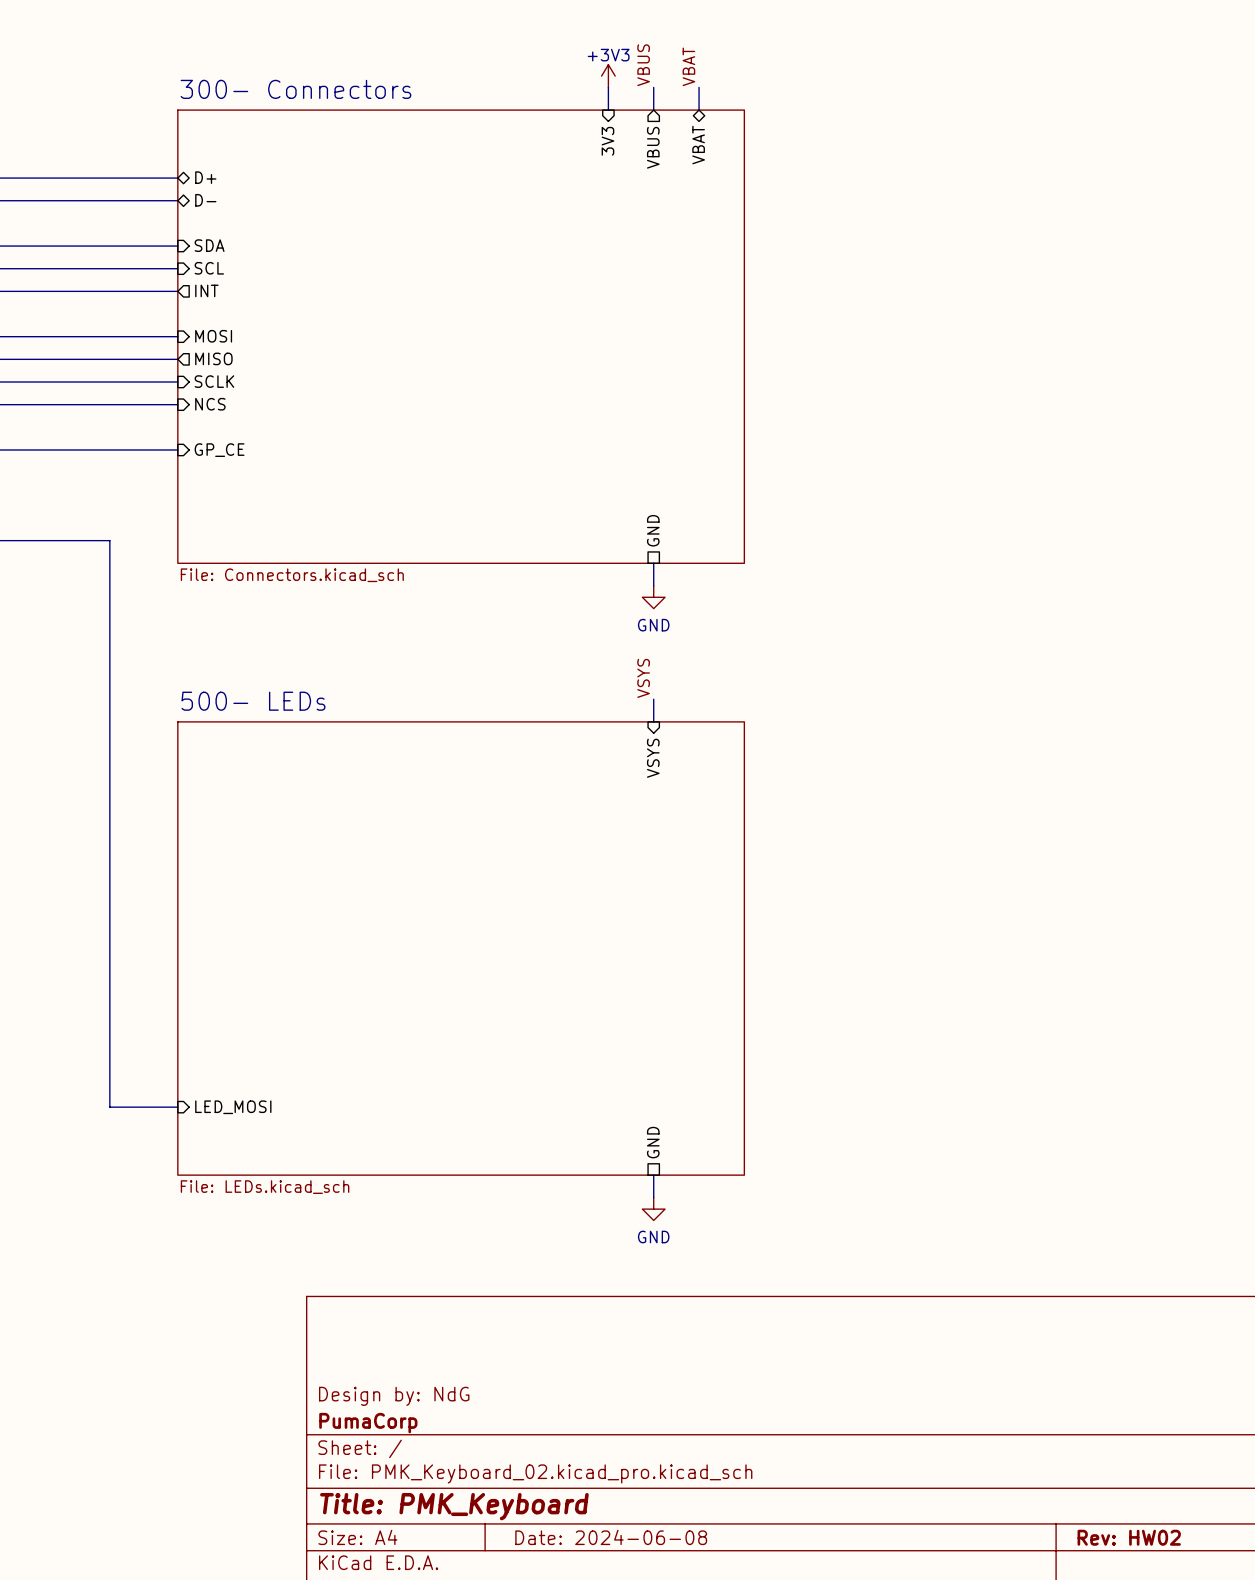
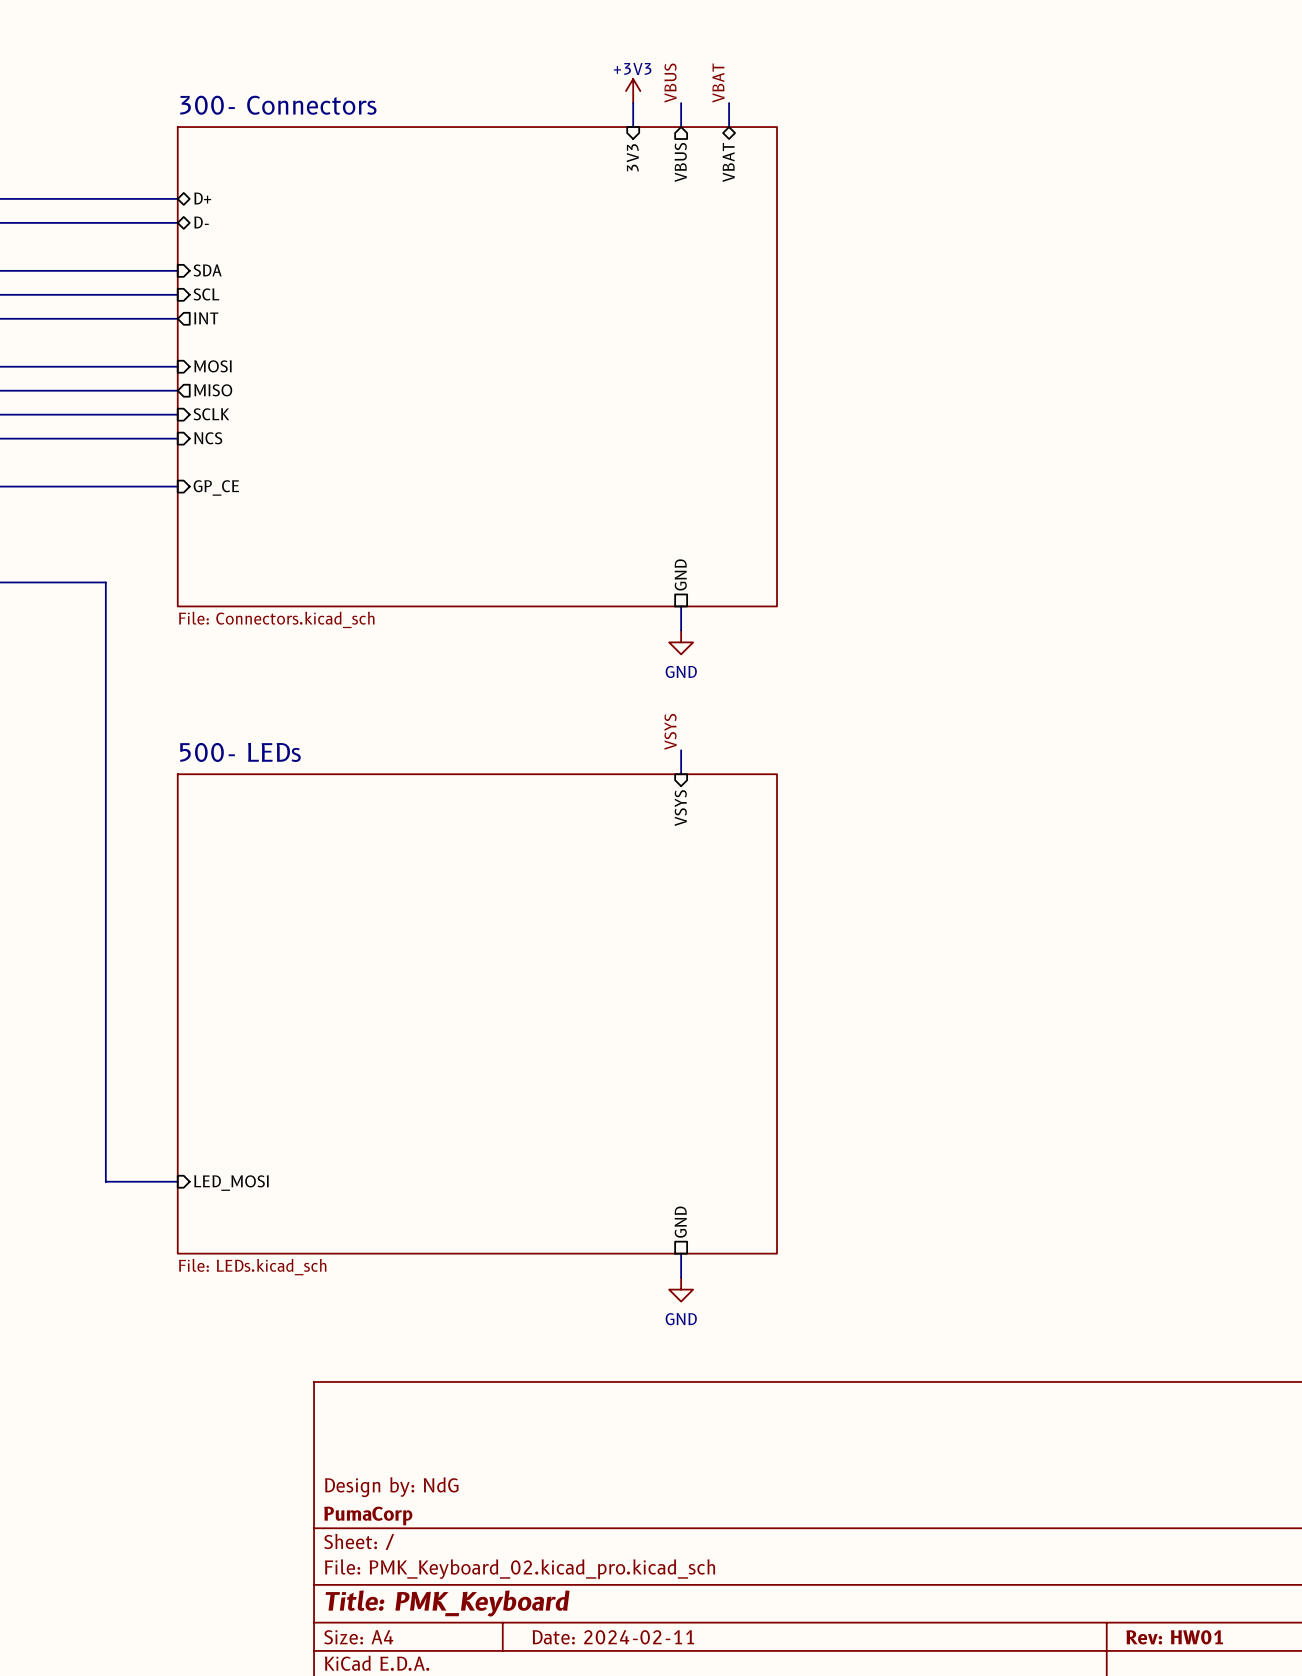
title block: Date: 2024-06-08 (611, 1537) -> Date: 2024-02-11 (613, 1637)
title block: Rev: HW02 (1129, 1537) -> Rev: HW01 (1174, 1637)

